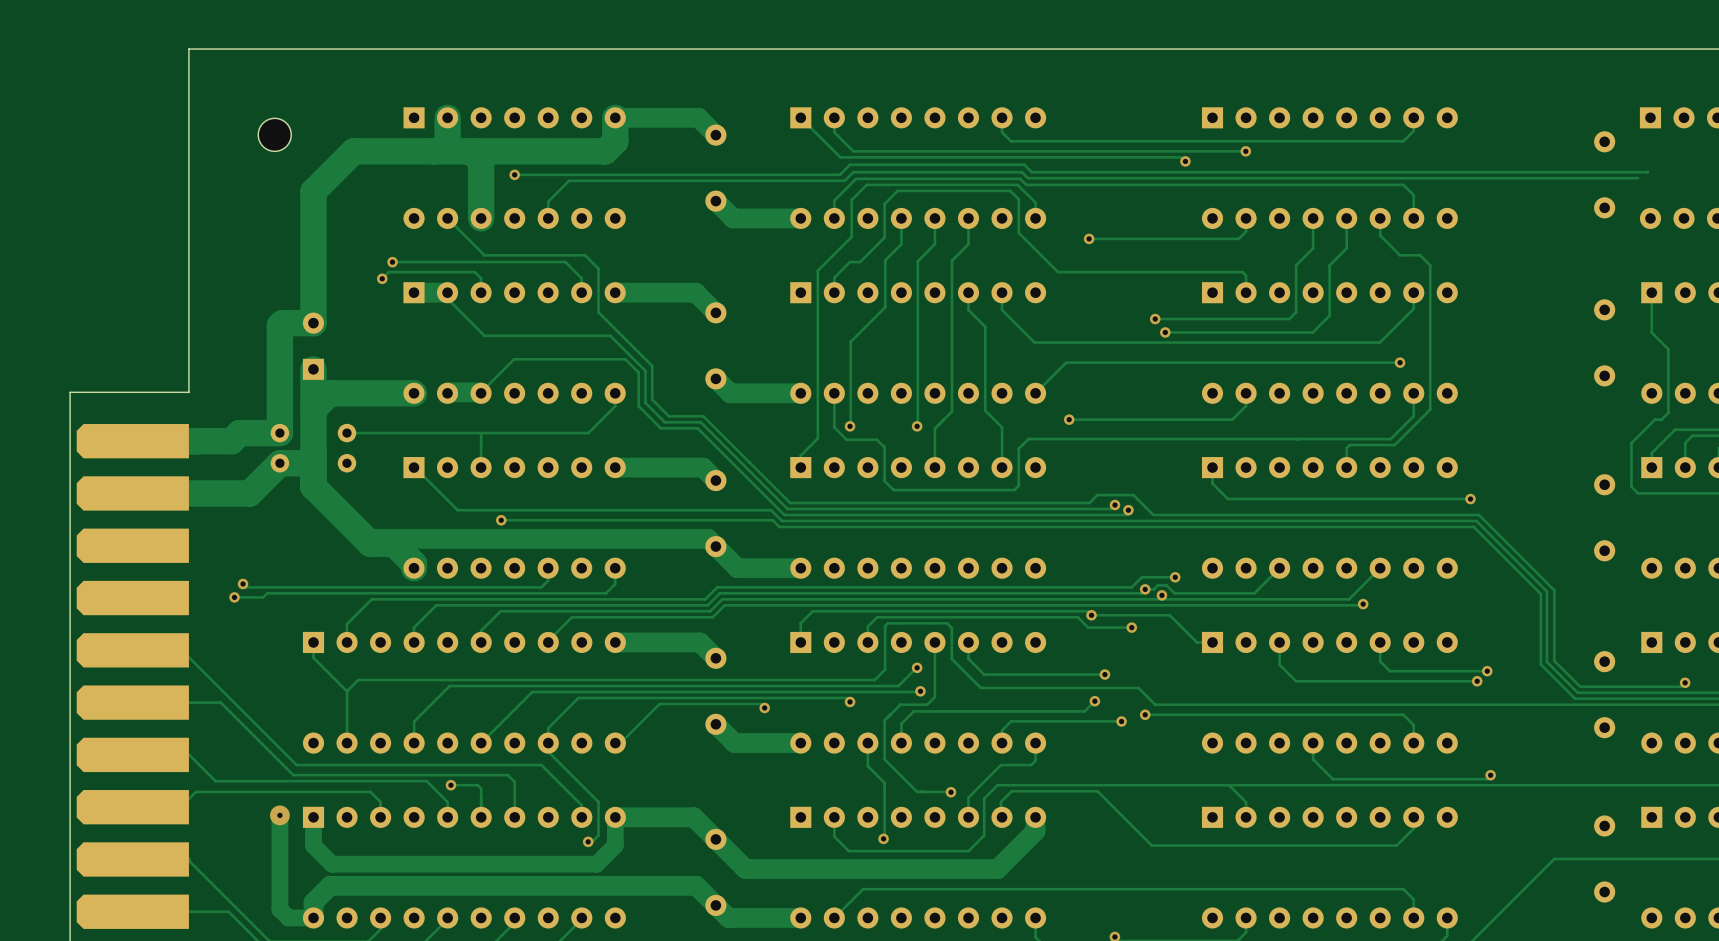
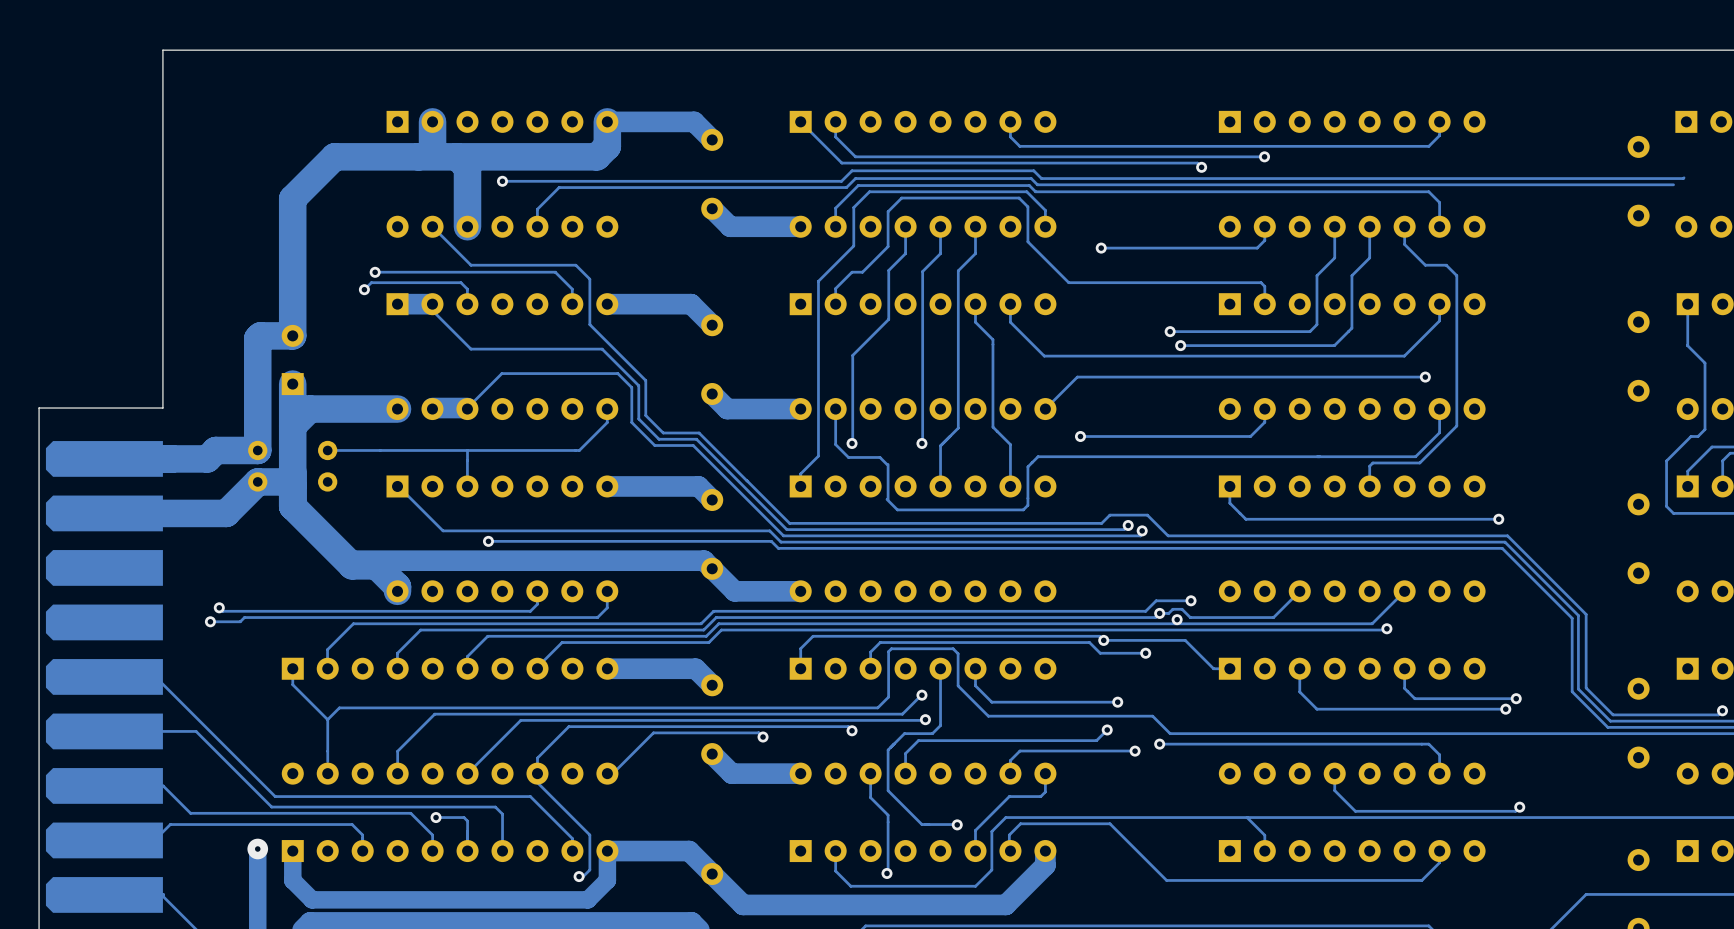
part: (274, 134) -> none

